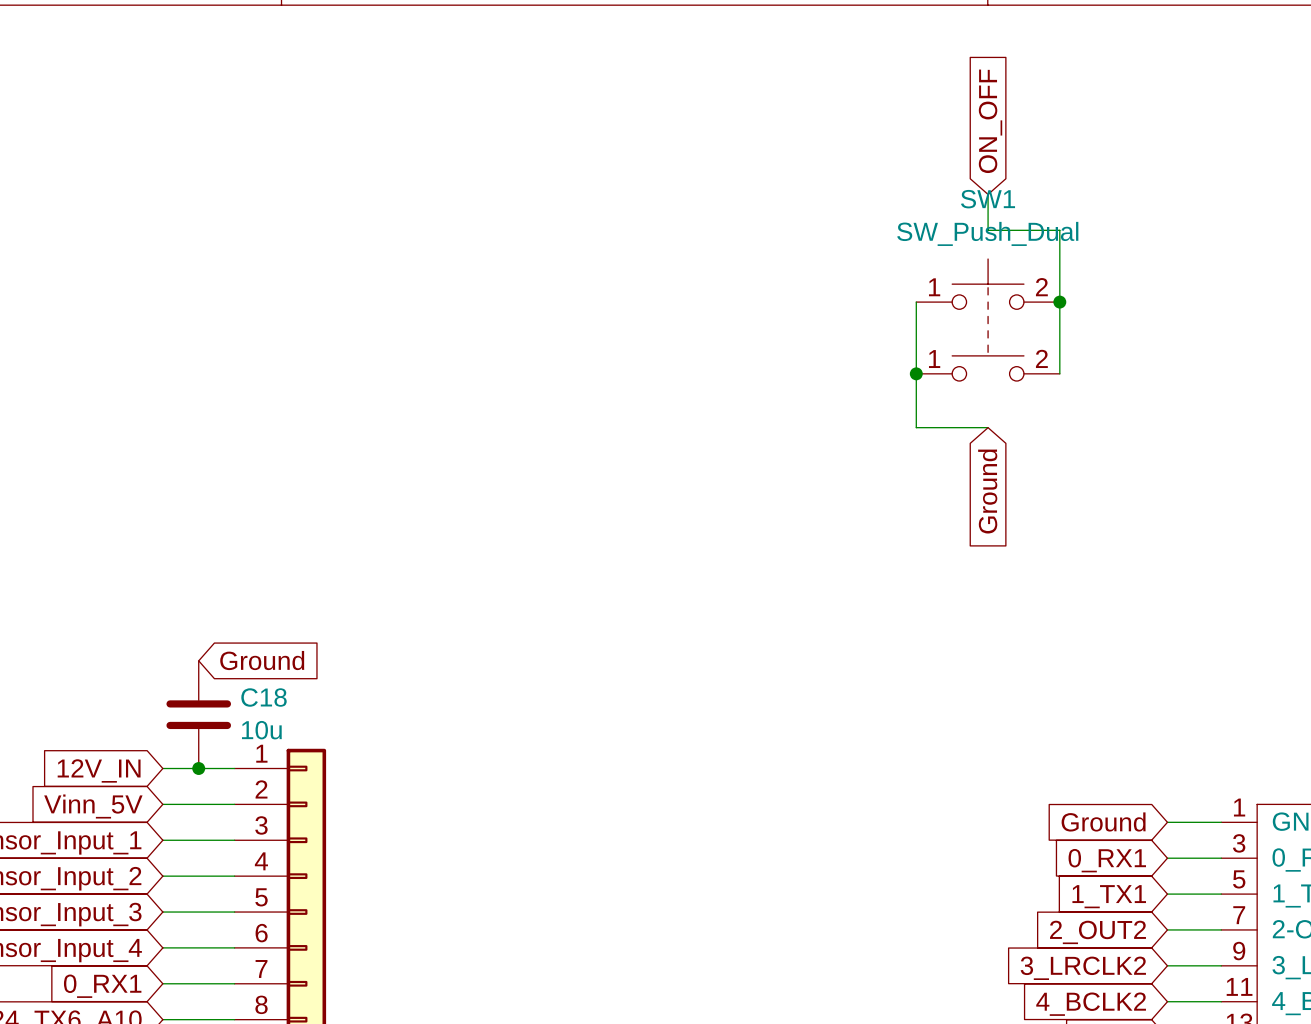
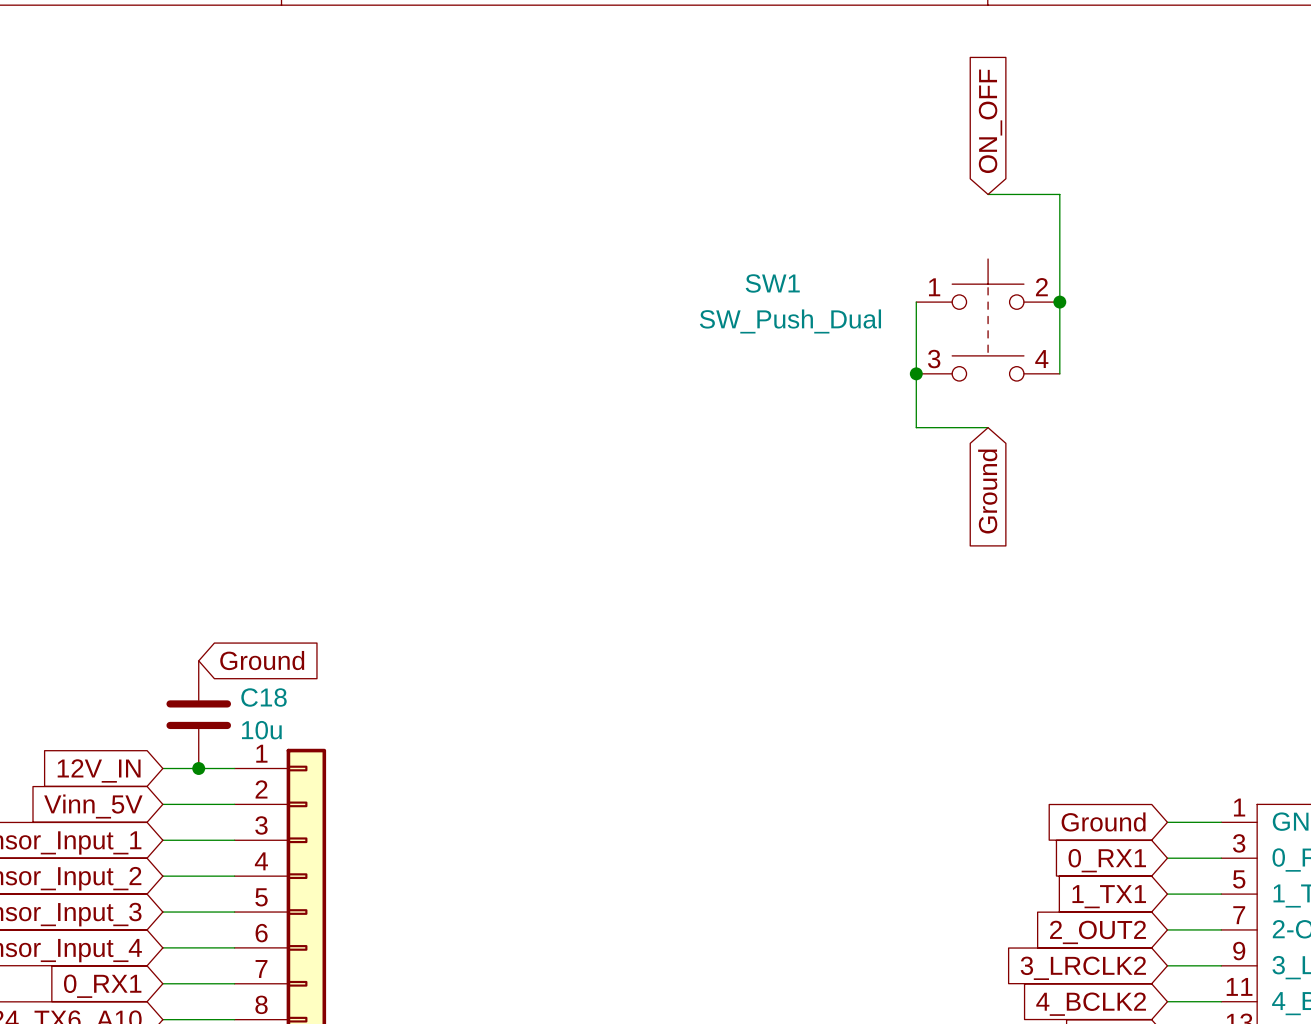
wire: (988, 194) (988, 230) (1059, 230) -> (988, 194) (1059, 194) (1059, 230)
SW1 name position: SW1 (988, 199) -> SW1 (772, 283)
SW1 value position: SW_Push_Dual (987, 233) -> SW_Push_Dual (790, 321)
SW1 pin number: 2 (1041, 358) -> 4 (1041, 359)
SW1 pin number: 1 (934, 359) -> 3 (934, 359)

